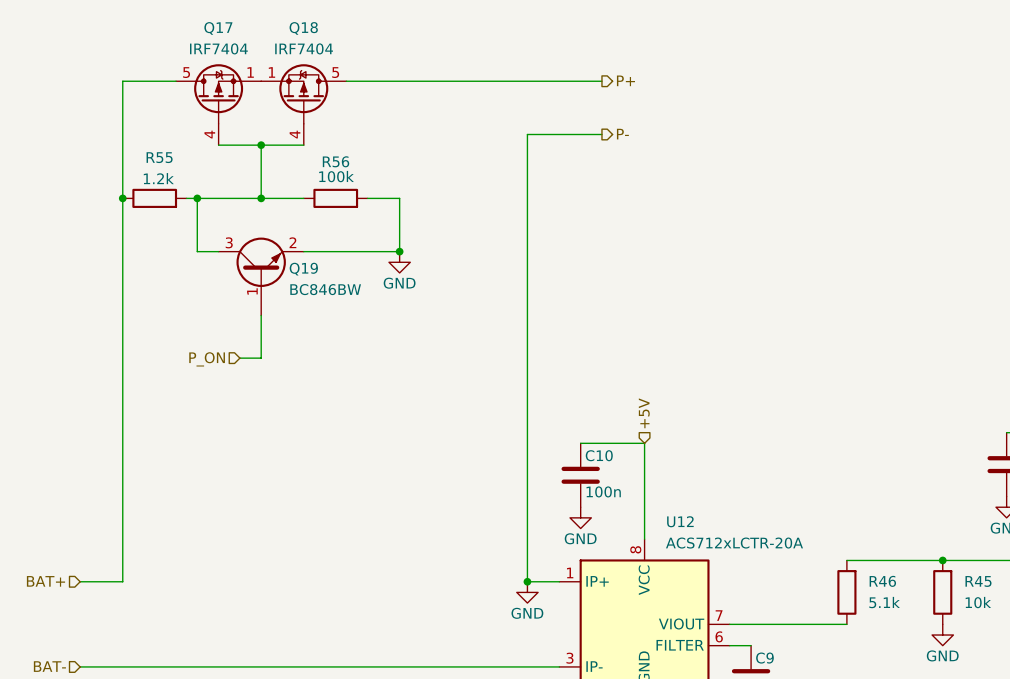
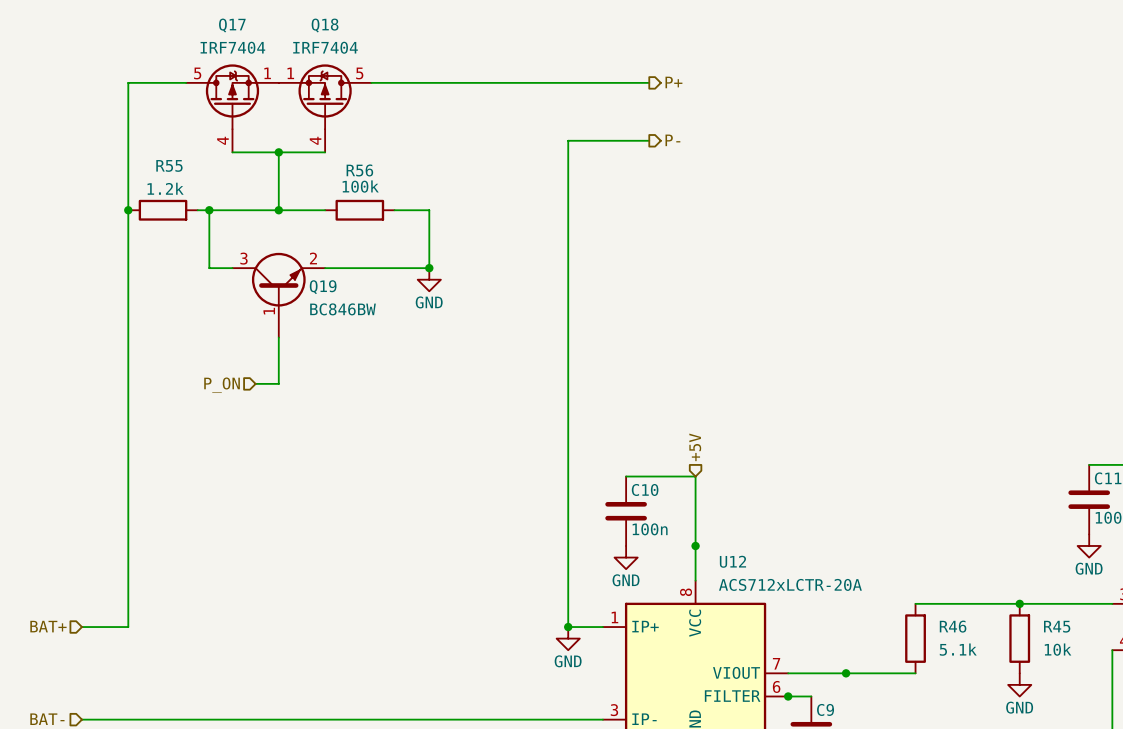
junction: none -> (695, 545)
junction: none -> (846, 673)
junction: none -> (788, 696)

